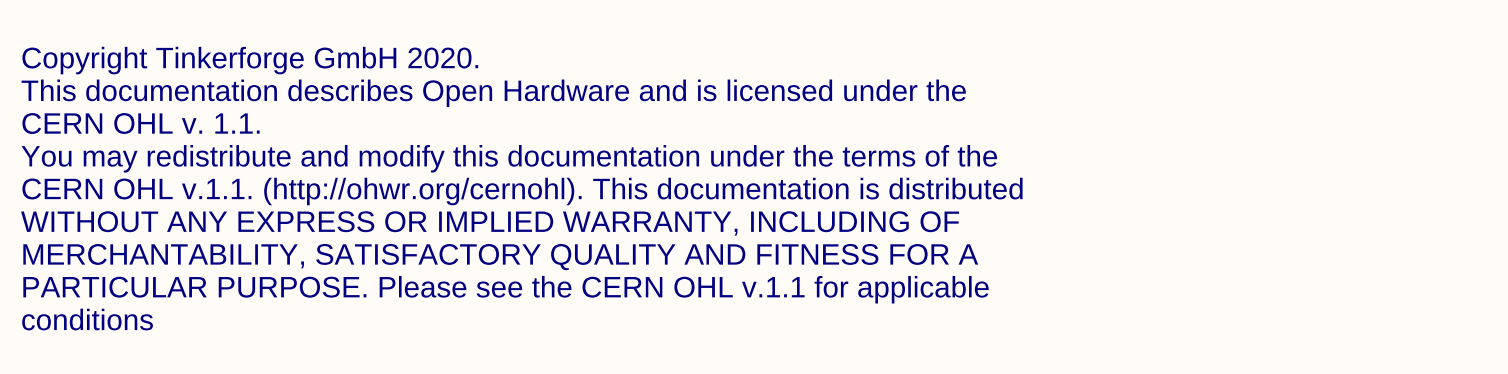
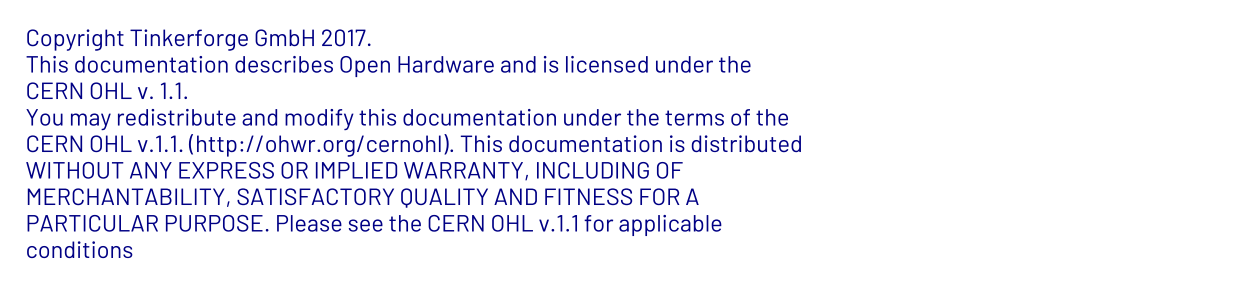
text: Copyright Tinkerforge GmbH 2020. (250, 60) -> Copyright Tinkerforge GmbH 2017. (198, 40)

